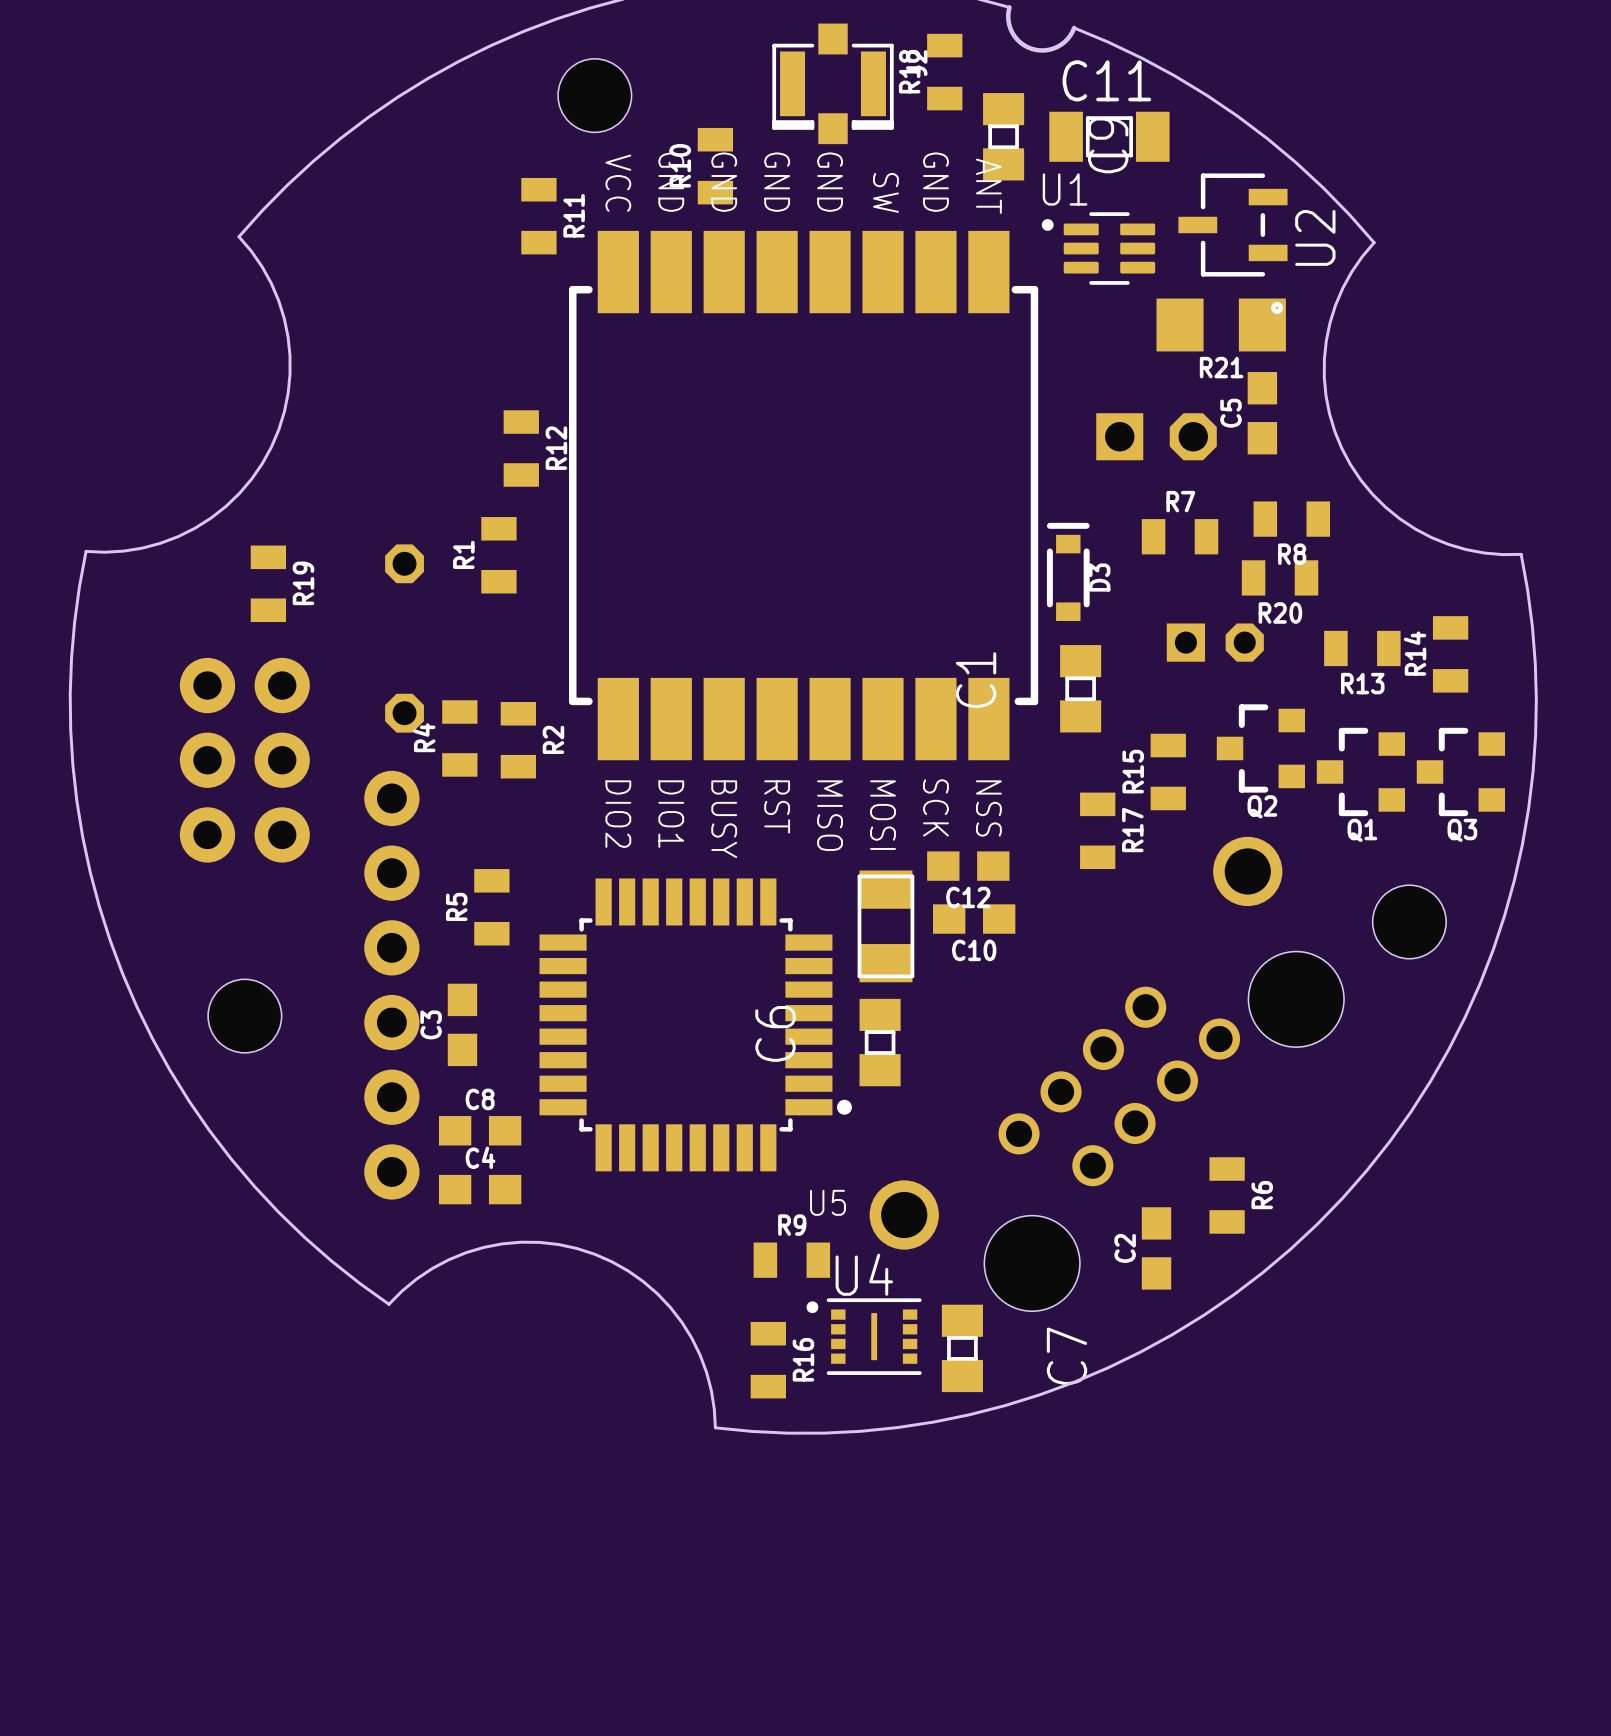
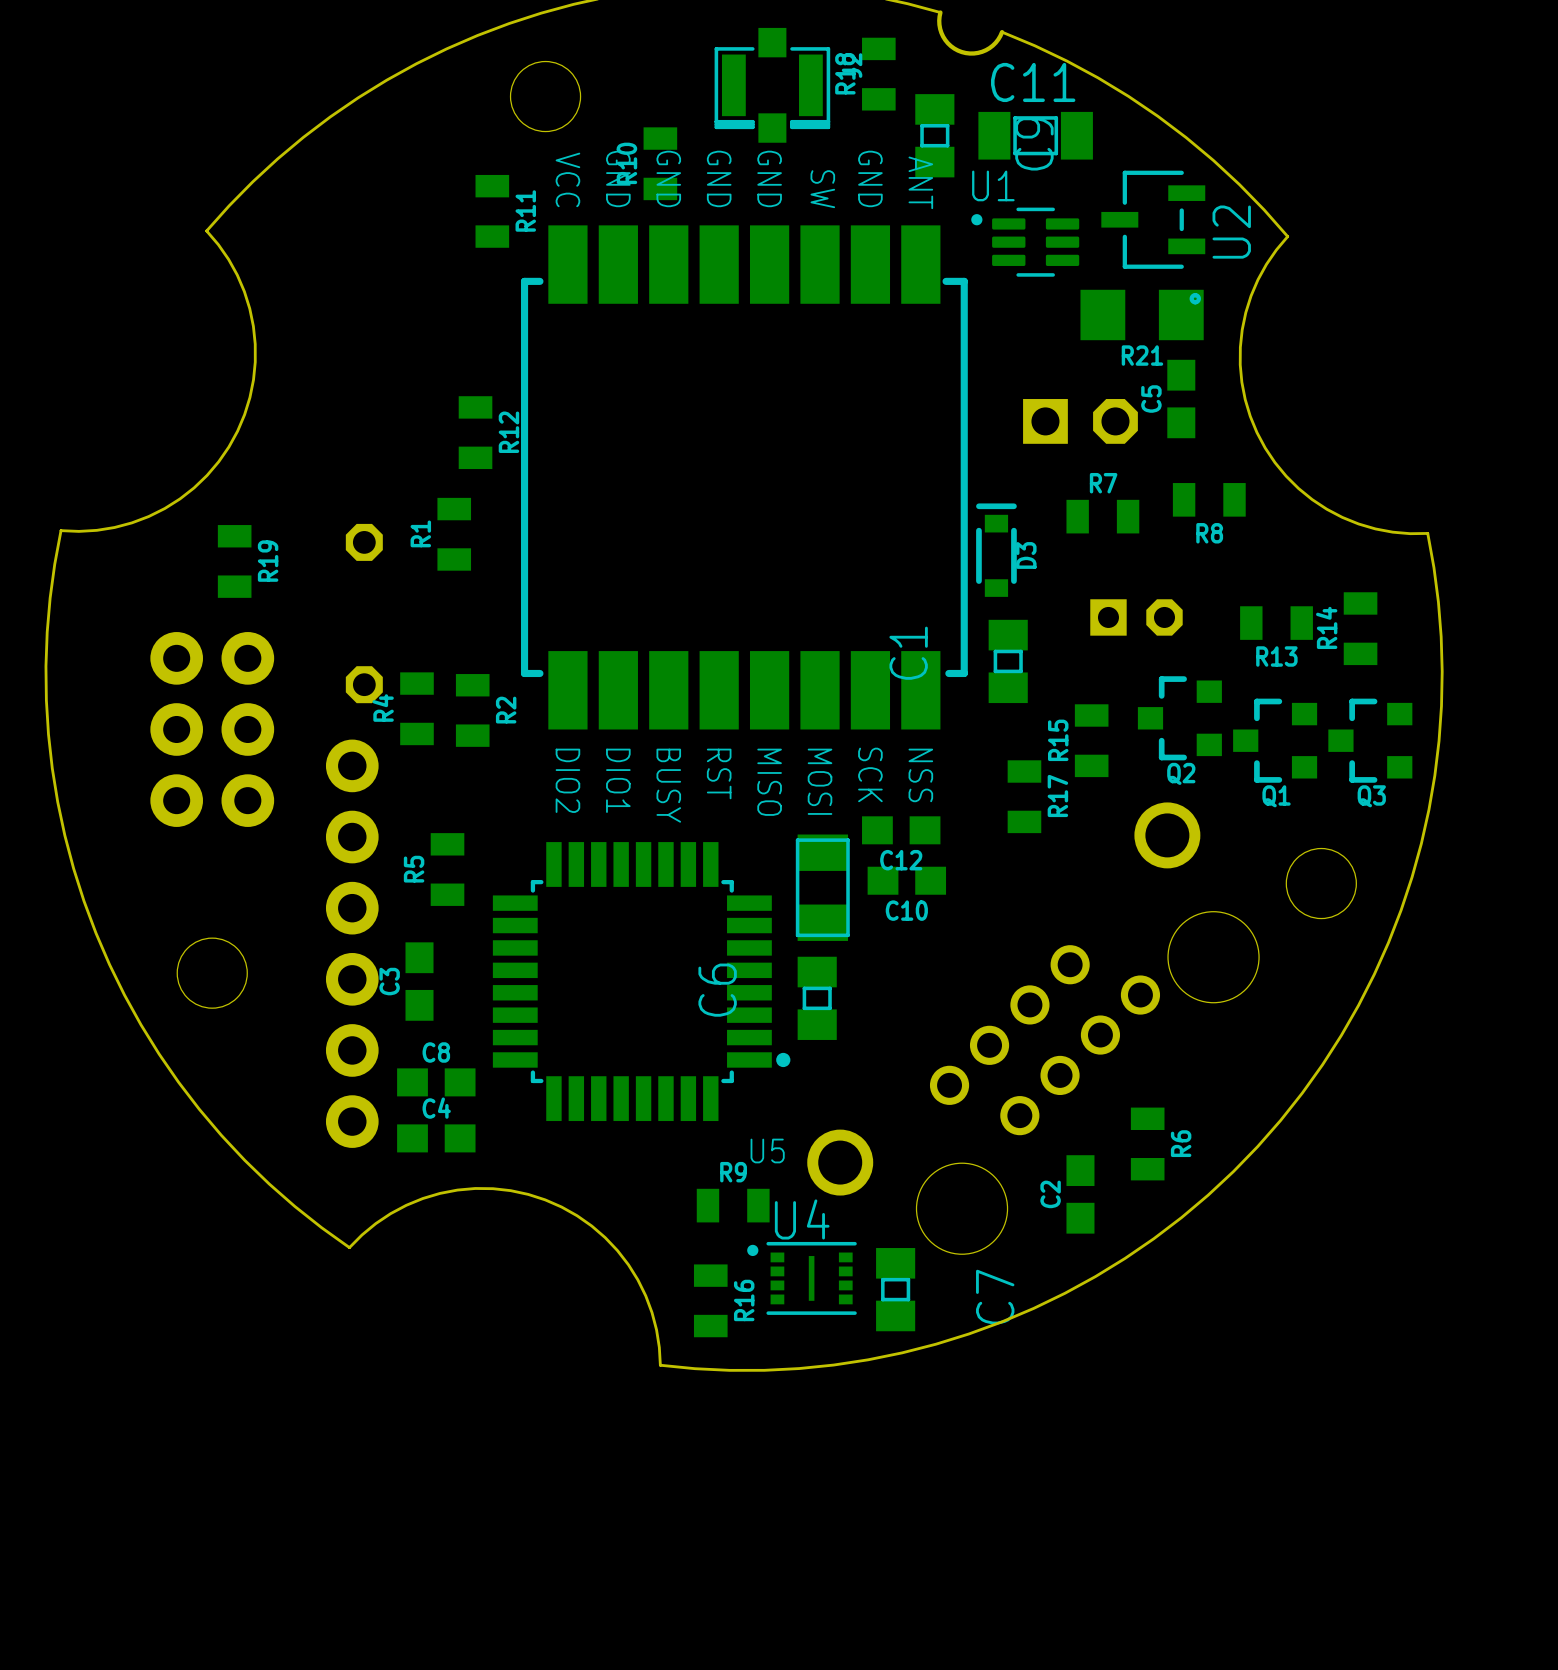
R20: (1280, 577) -> none

